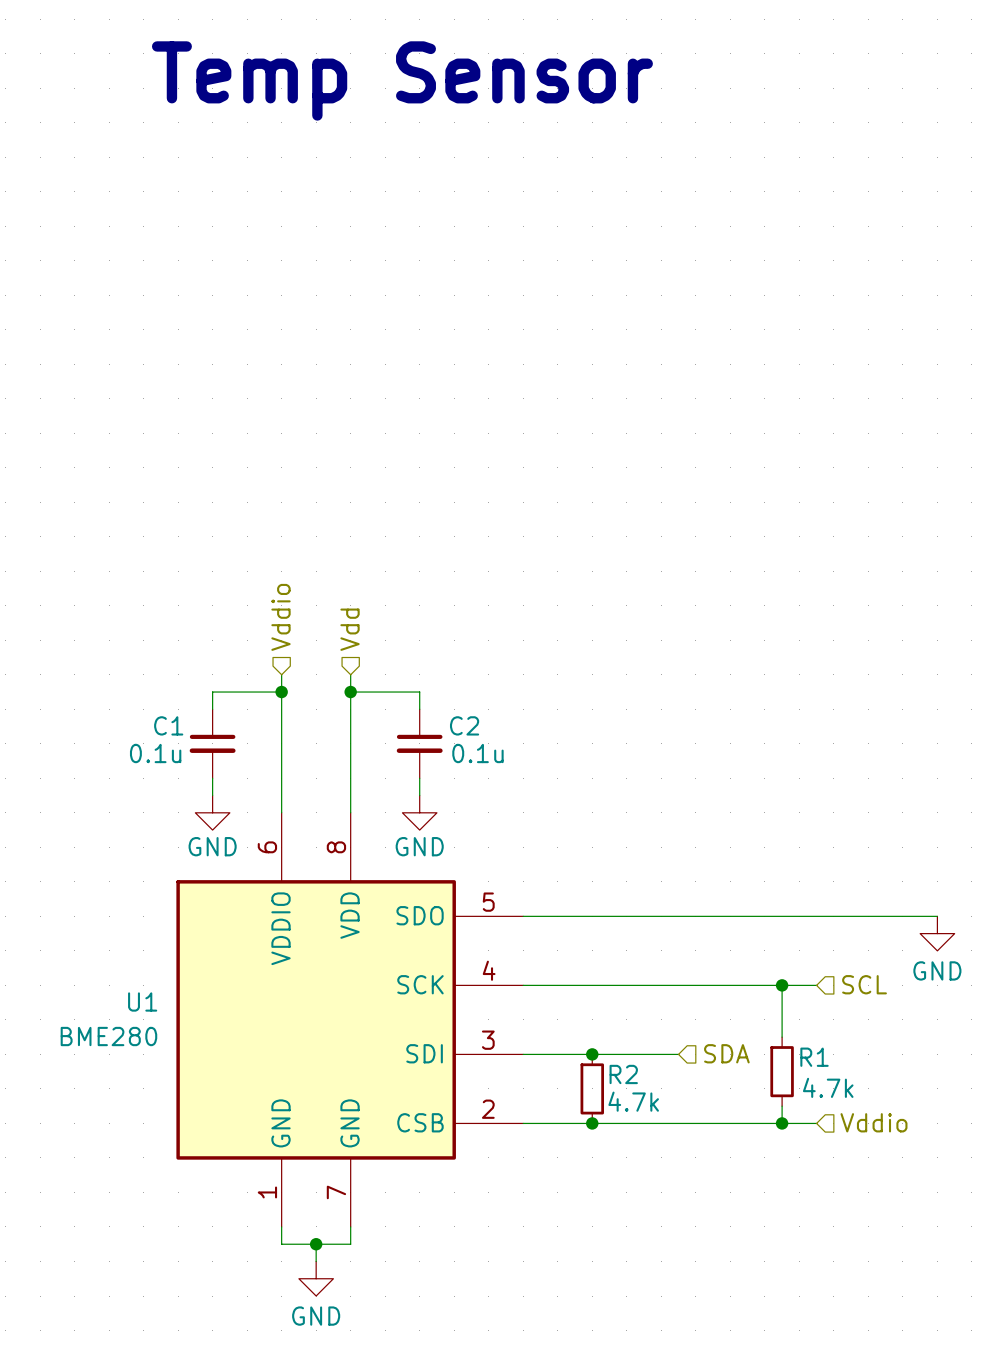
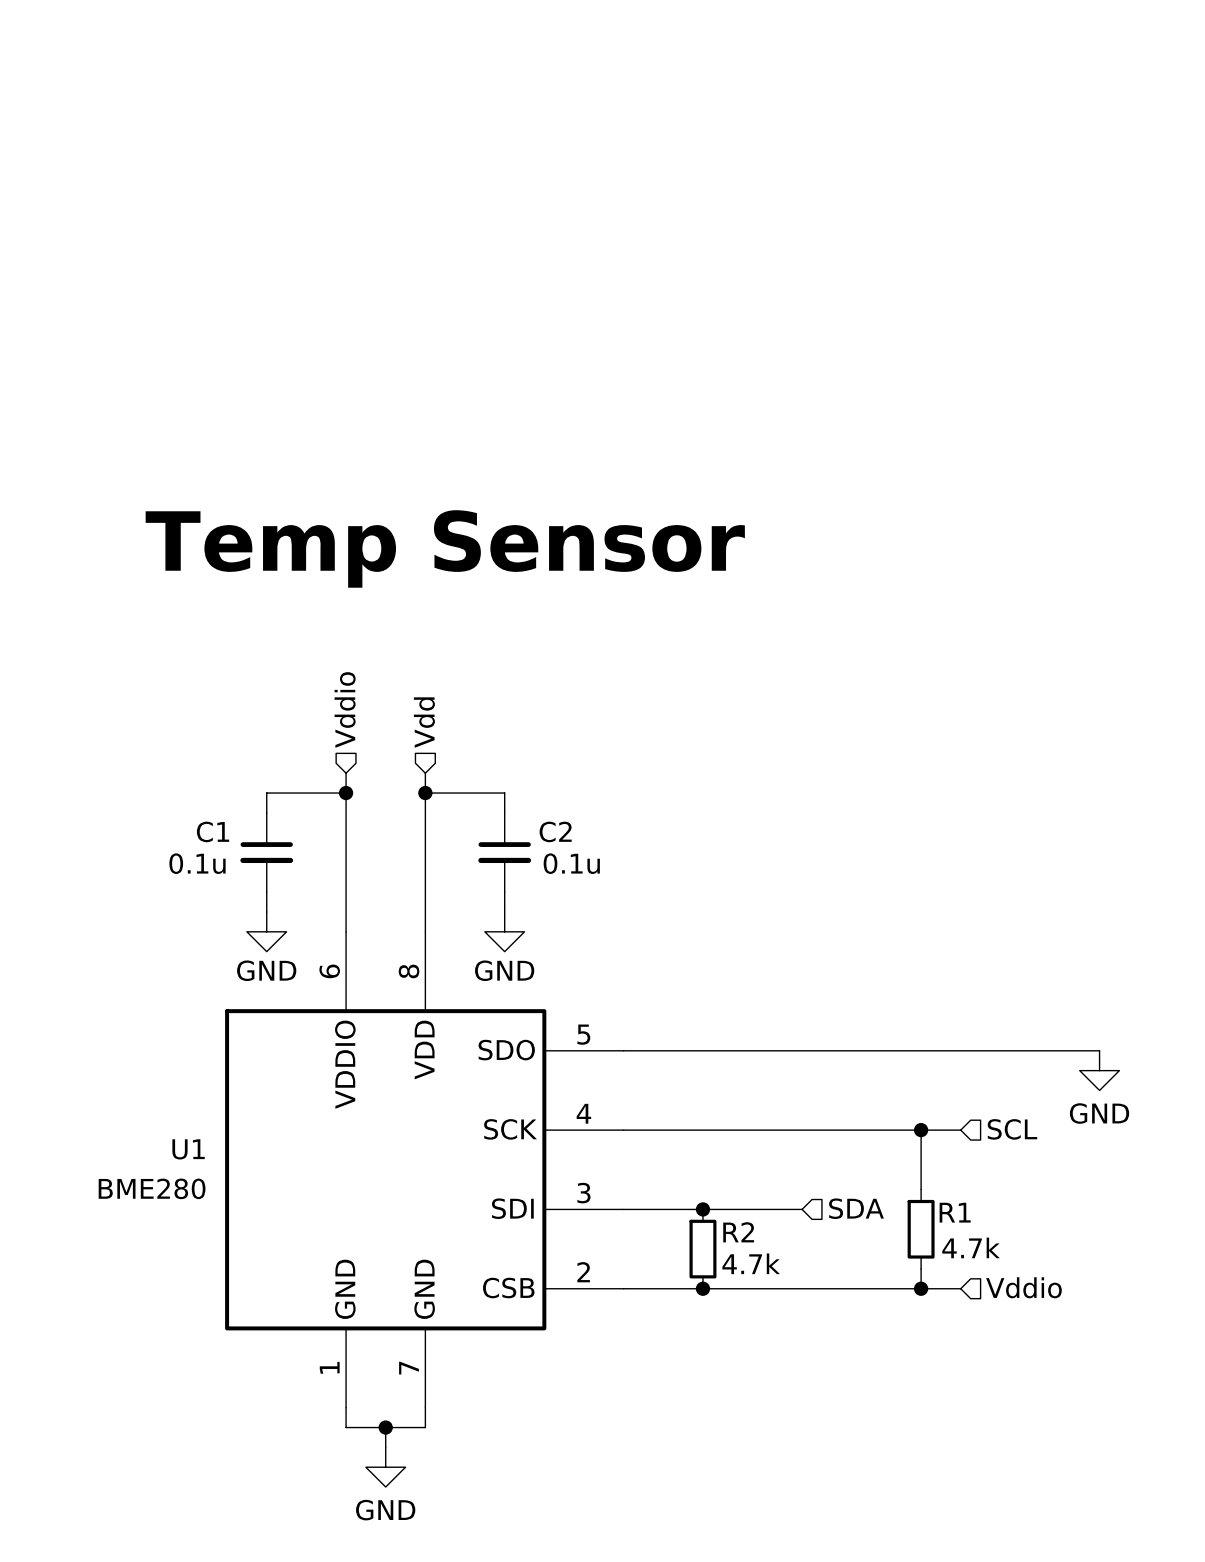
text: Temp Sensor (402, 80) -> none
text: none -> Temp Sensor (445, 548)

